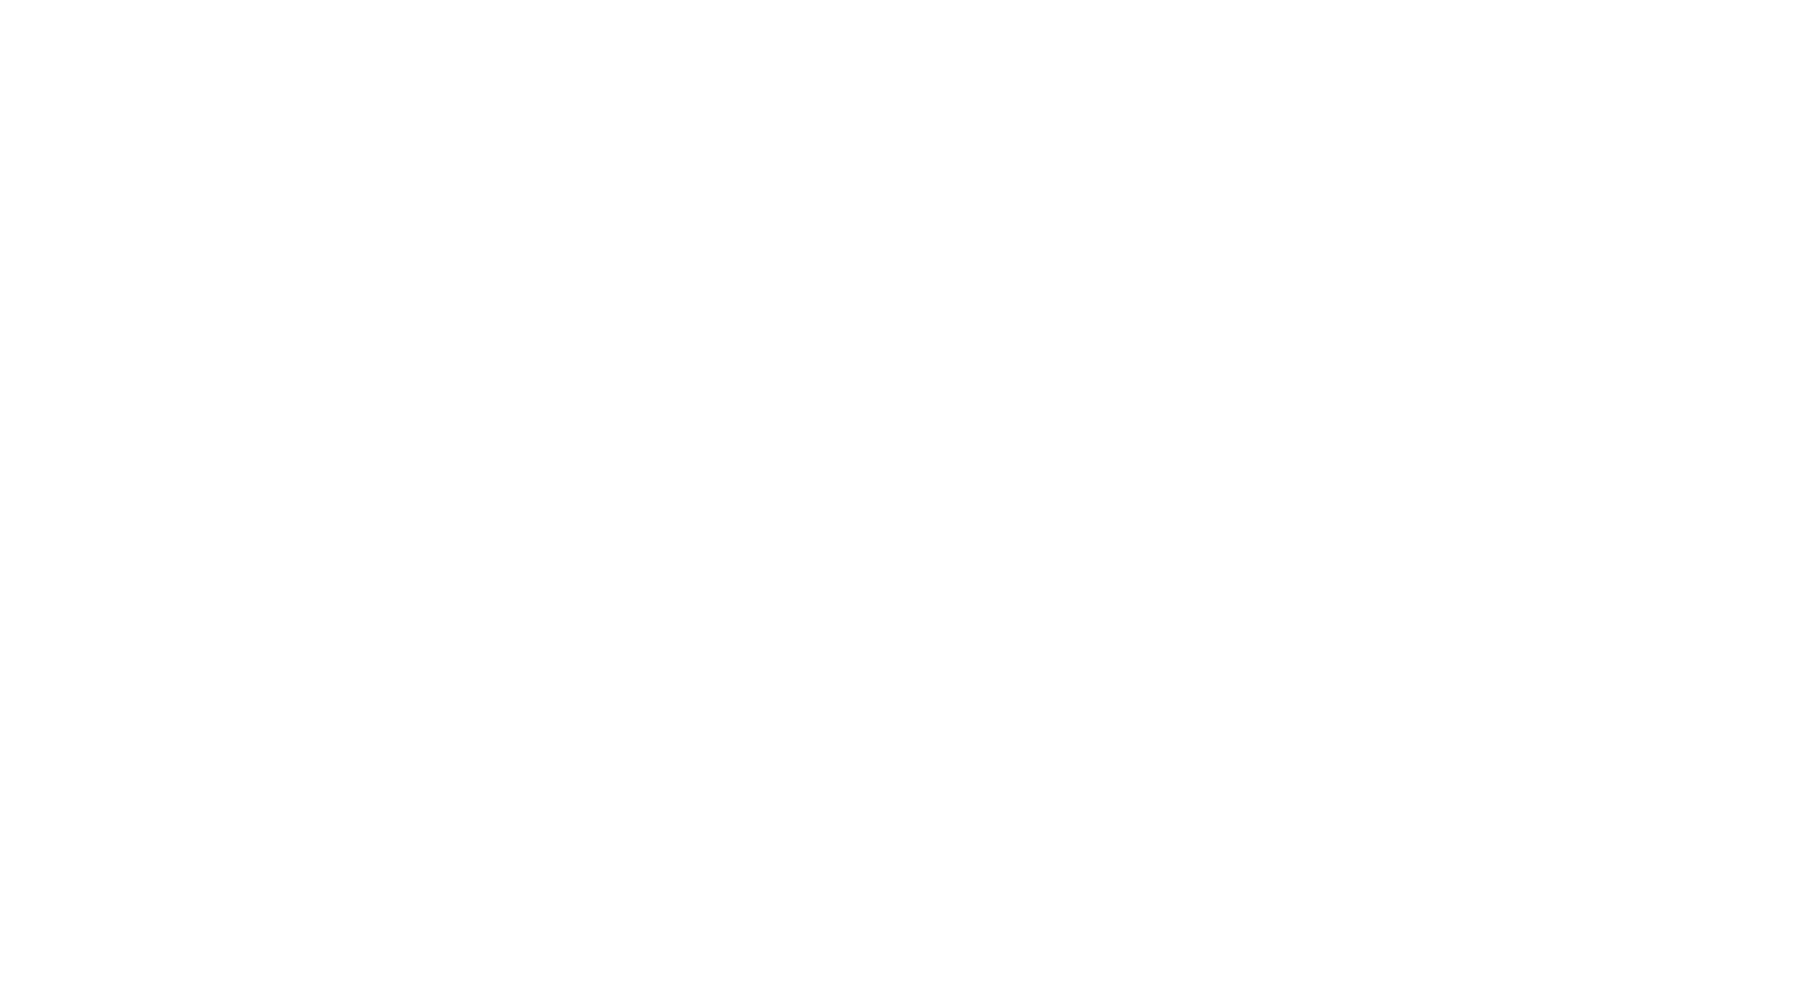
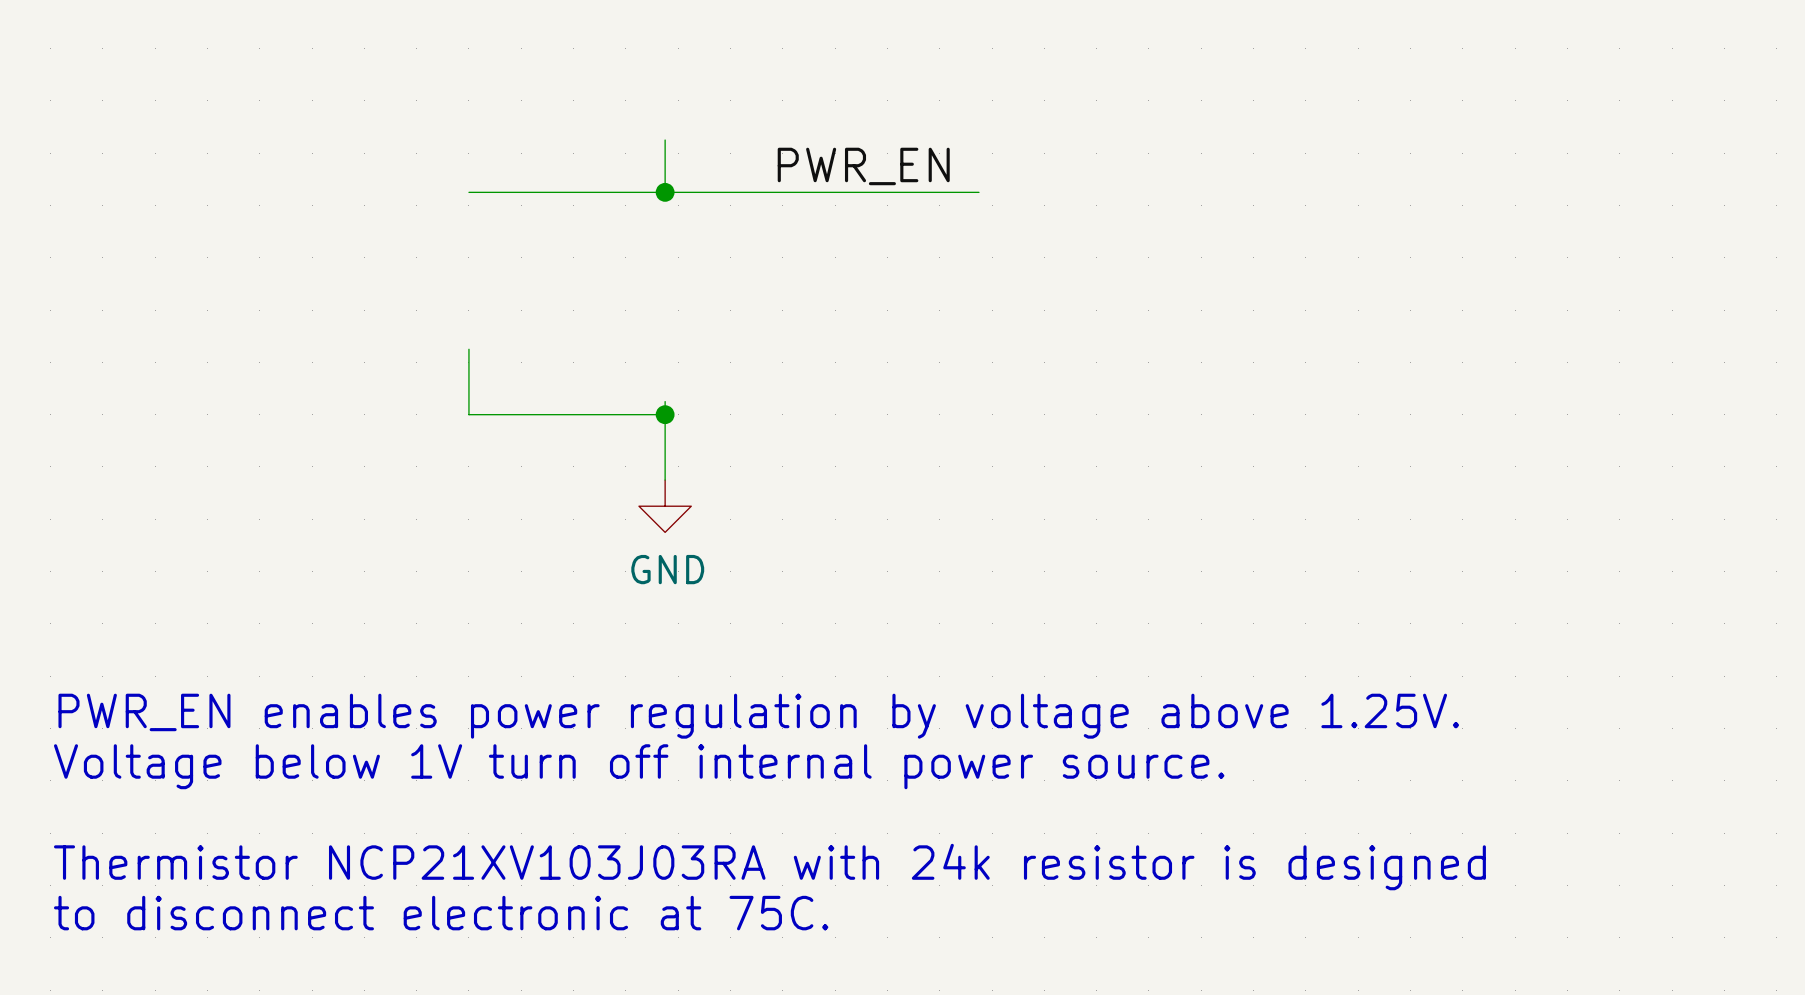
wire: none -> (665, 140) (665, 192)
label: none -> PWR_EN (863, 166)
wire: none -> (468, 192) (978, 192)
junction: none -> (665, 192)
wire: none -> (468, 349) (468, 414) (665, 414)
wire: none -> (665, 401) (665, 480)
junction: none -> (665, 414)
power symbol: none -> GND (665, 506)
text: none -> PWR_EN enables power regulation by voltage above 1.25V. (758, 716)
text: none -> Voltage below 1V turn off internal power source. (639, 766)
text: none -> Thermistor NCP21XV103J03RA with 24k resistor is designed (769, 867)
text: none -> to disconnect electronic at 75C. (441, 913)

